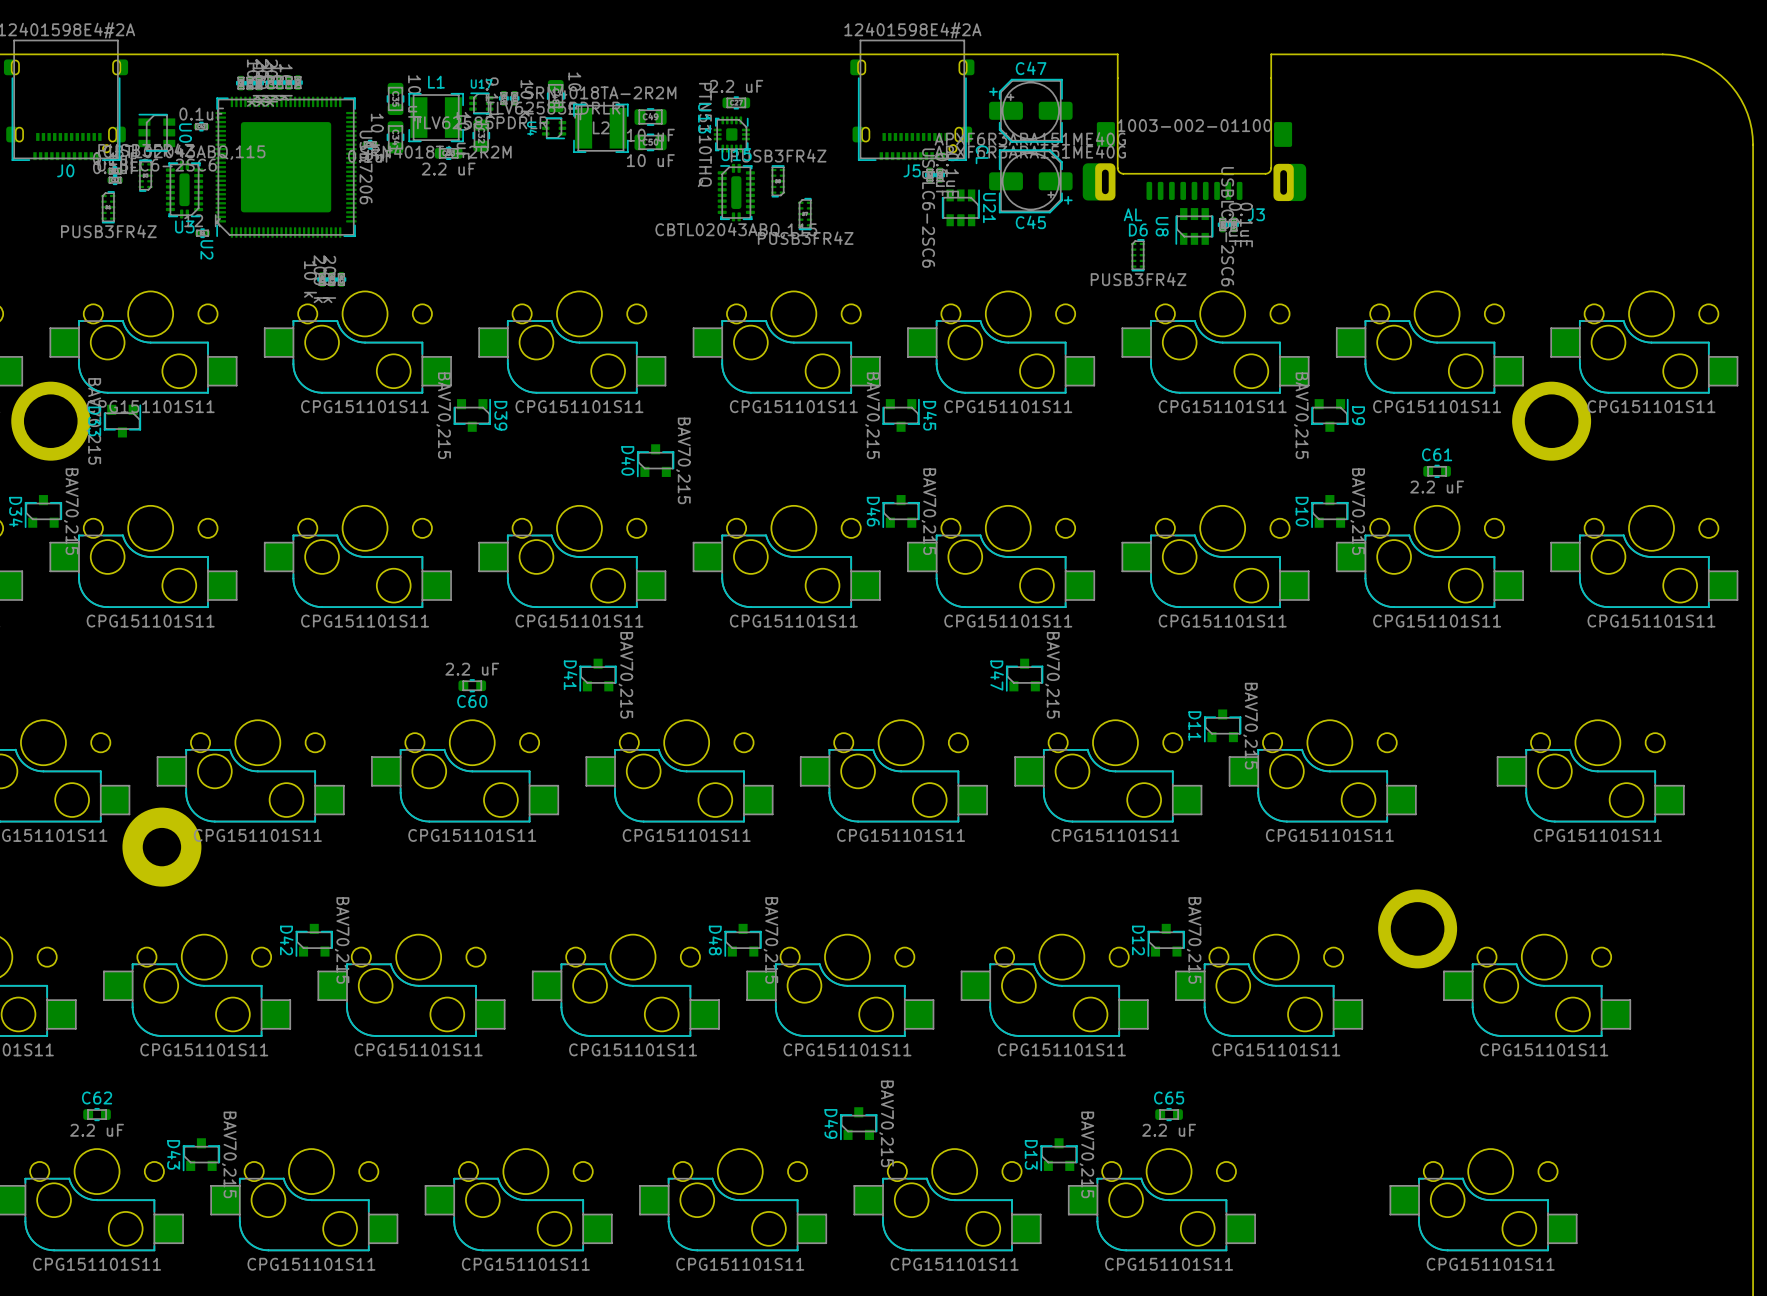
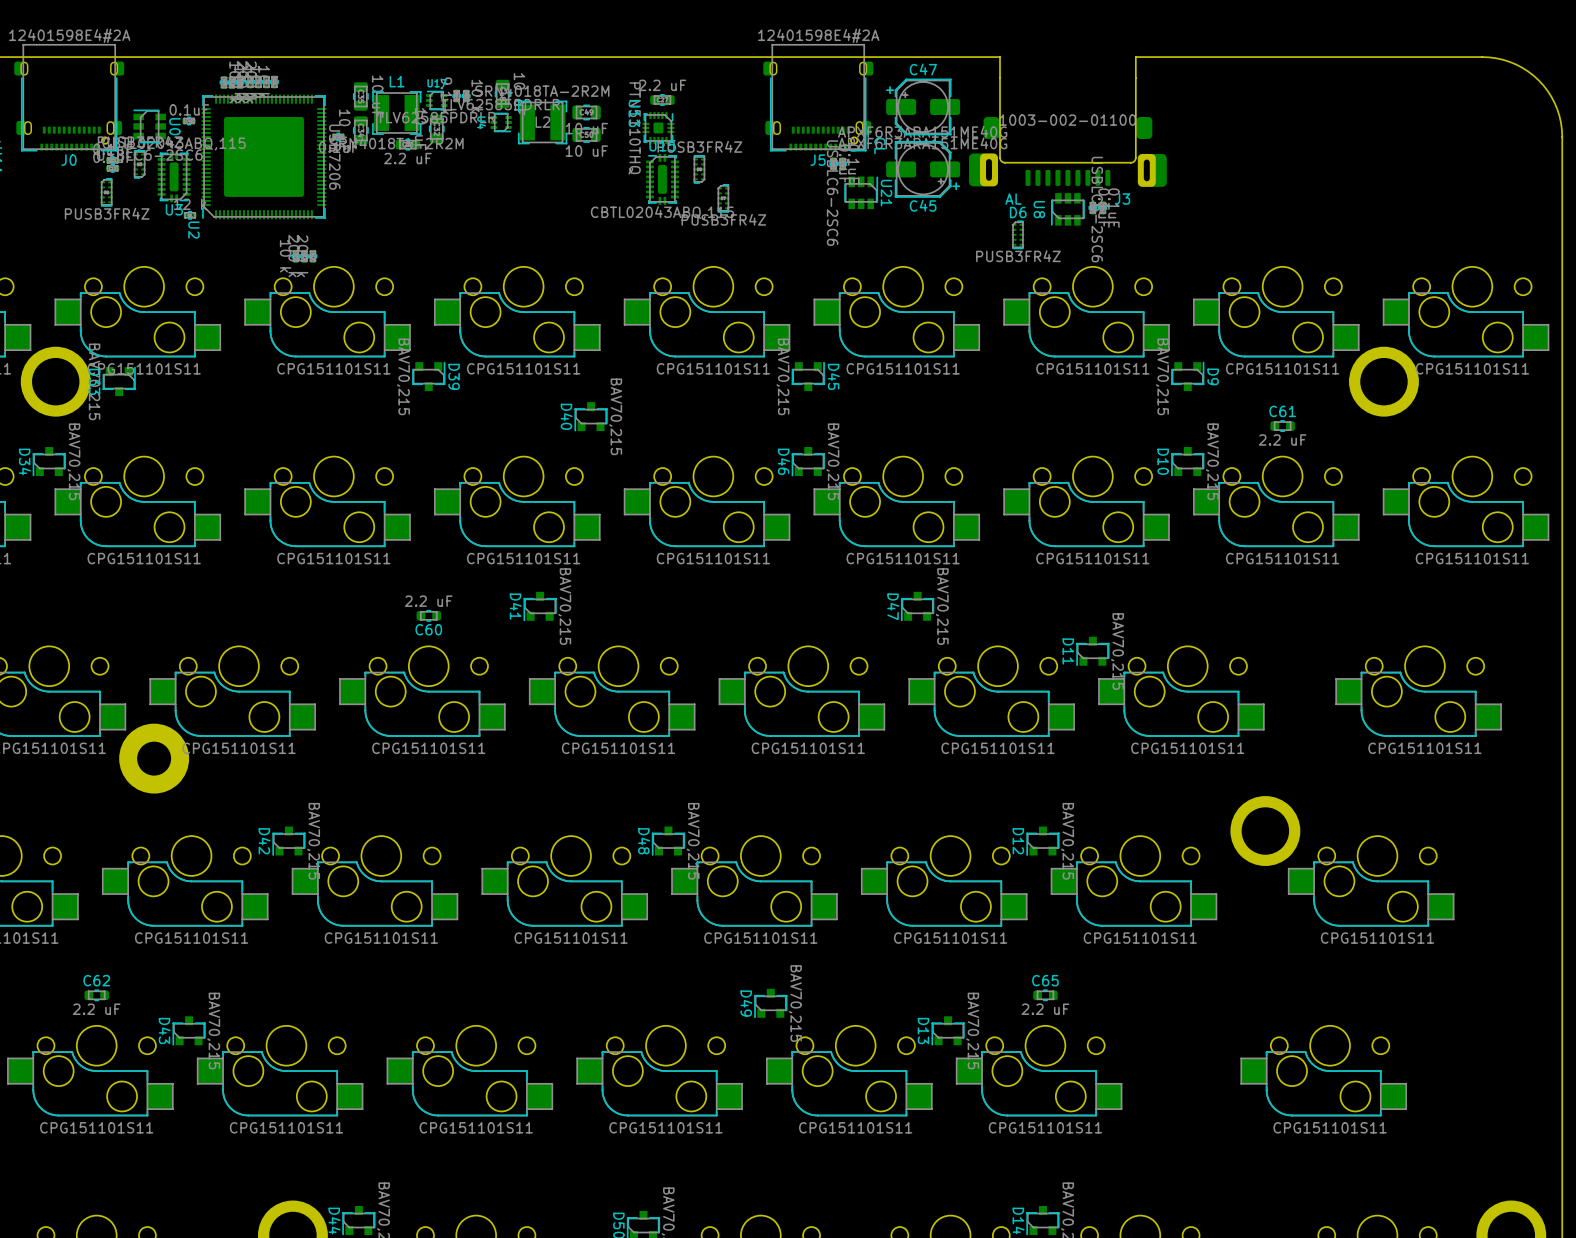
J3 footprint: [1082, 77, 1307, 202] -> [969, 77, 1167, 187]

